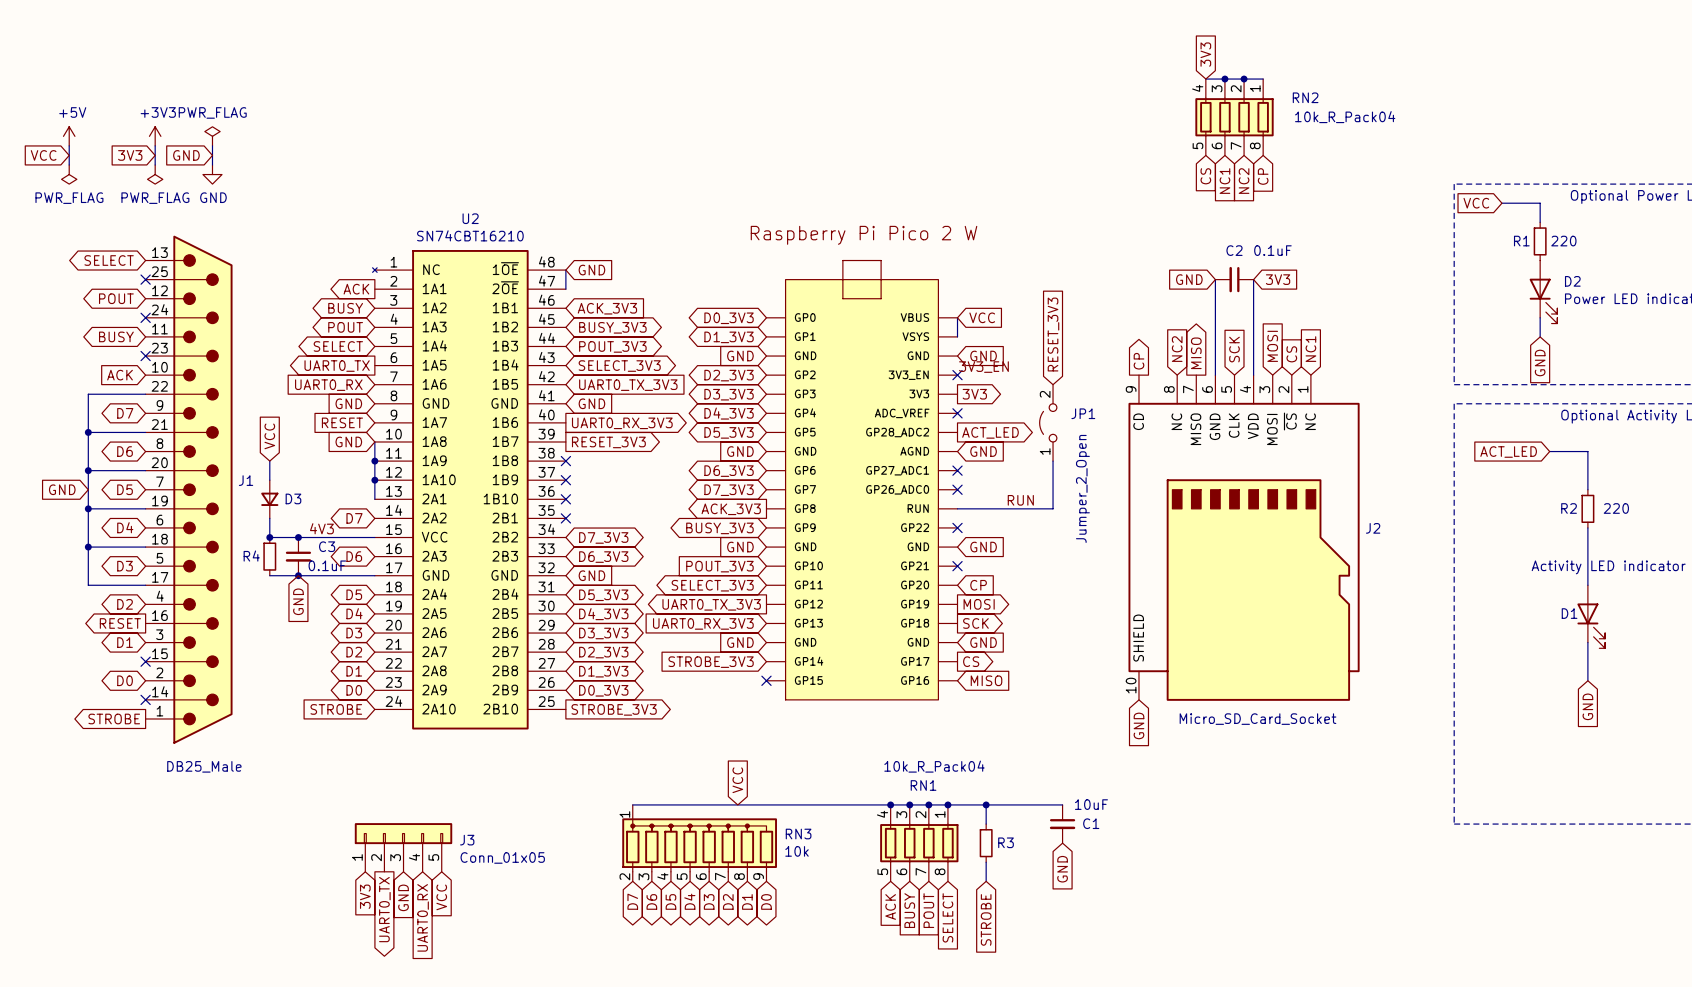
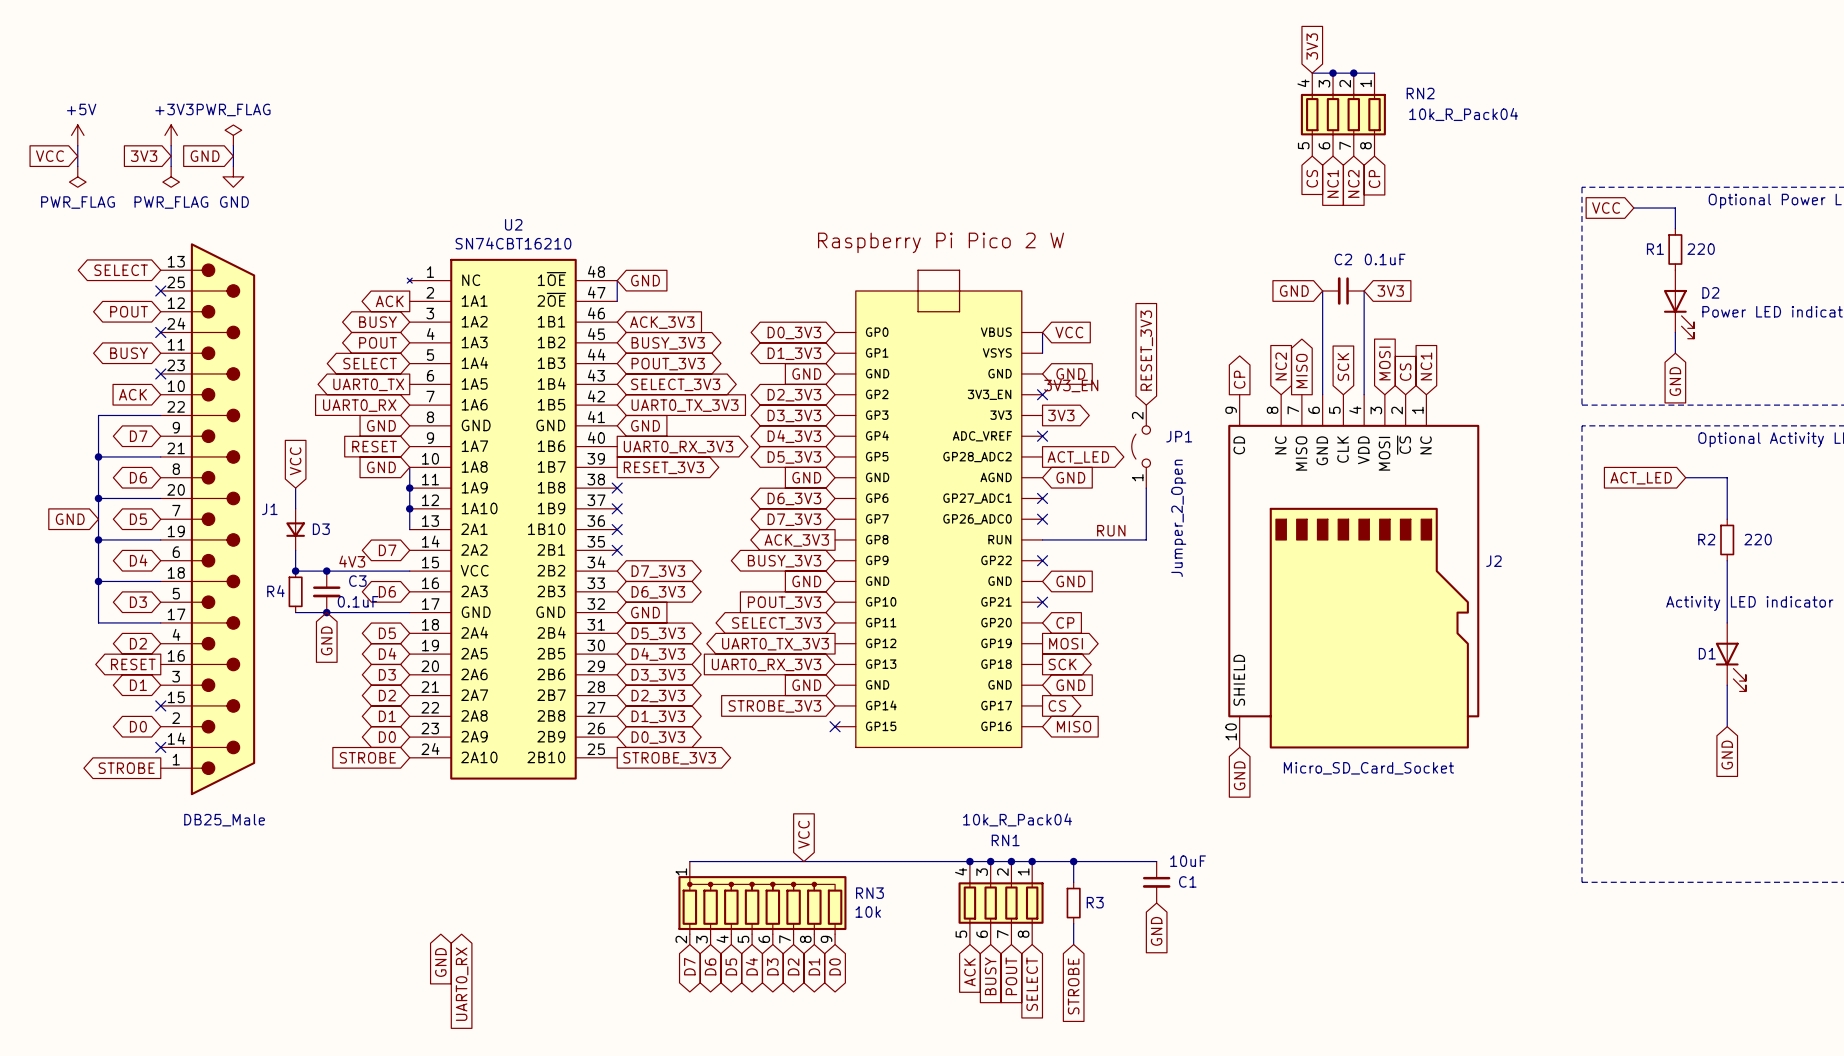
J3: Conn_01x05 (403, 847) -> none
global label: 3V3 (365, 896) -> none
global label: VCC (441, 897) -> none
global label: UART0_TX (384, 909) -> none

